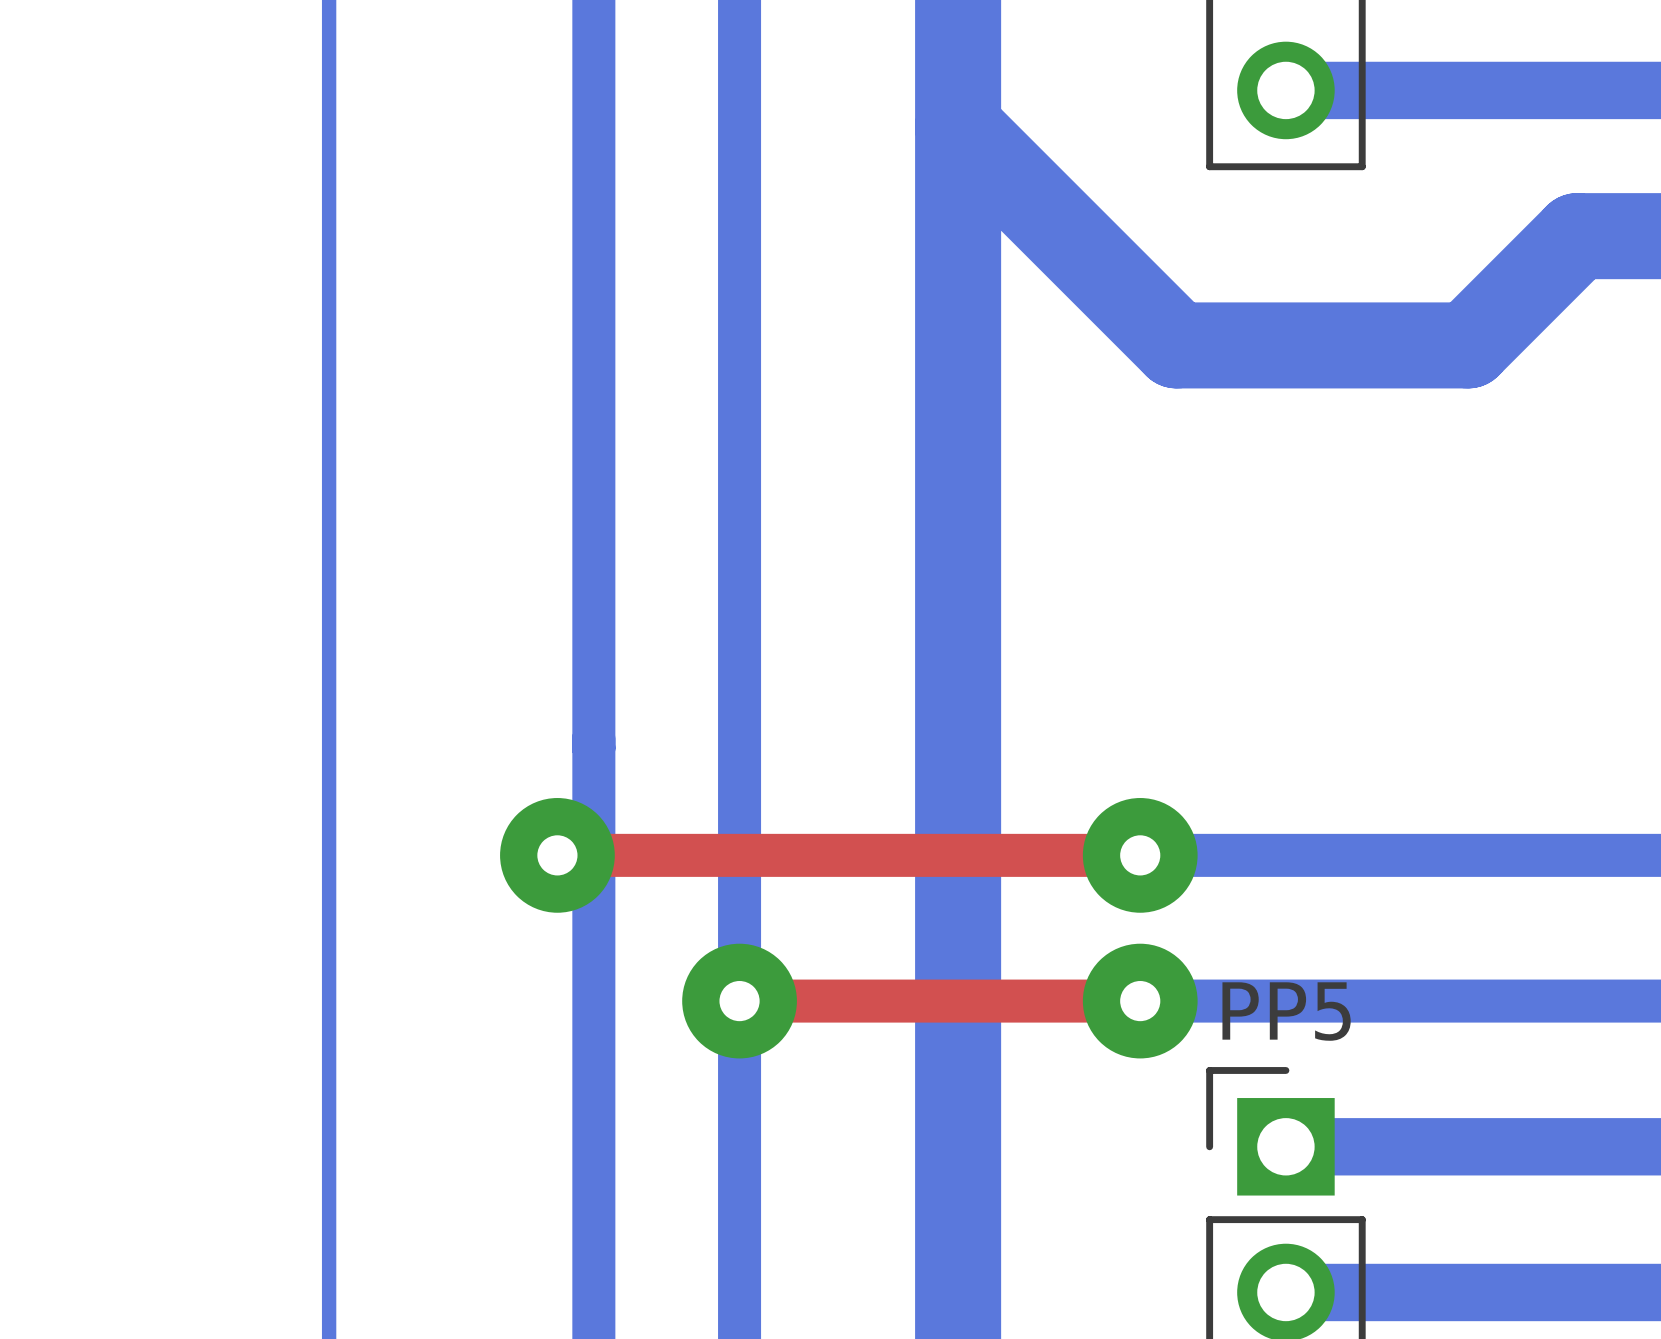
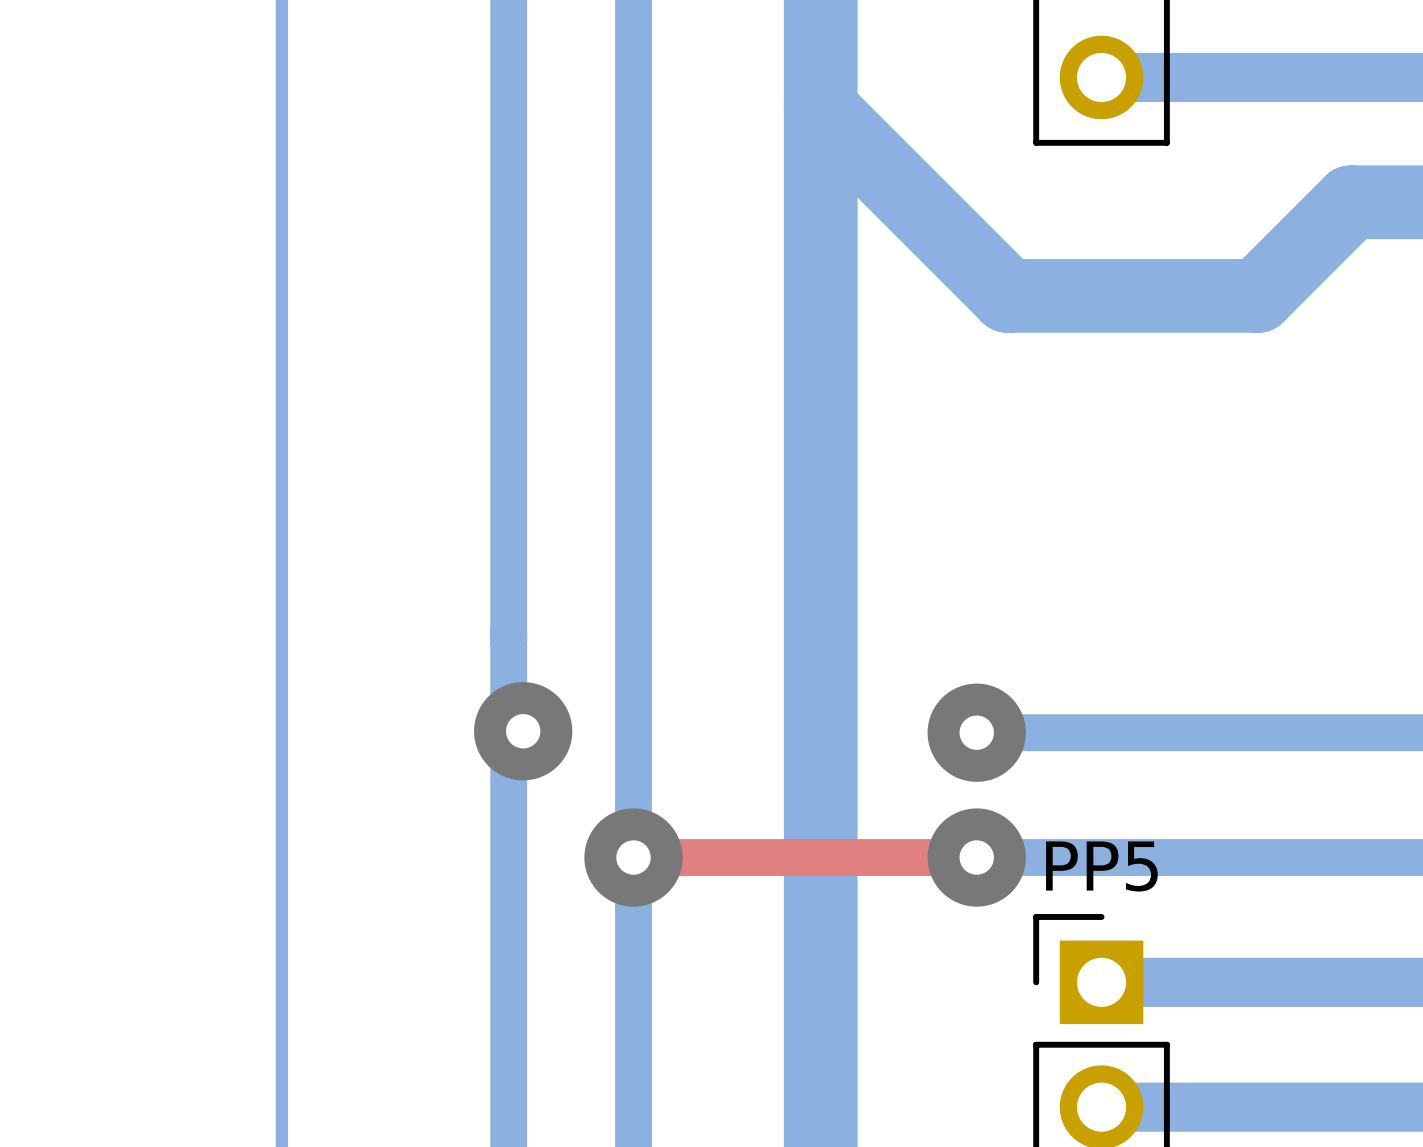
top track: (557, 855) (1140, 855) -> none
via position: (557, 855) -> (523, 731)

